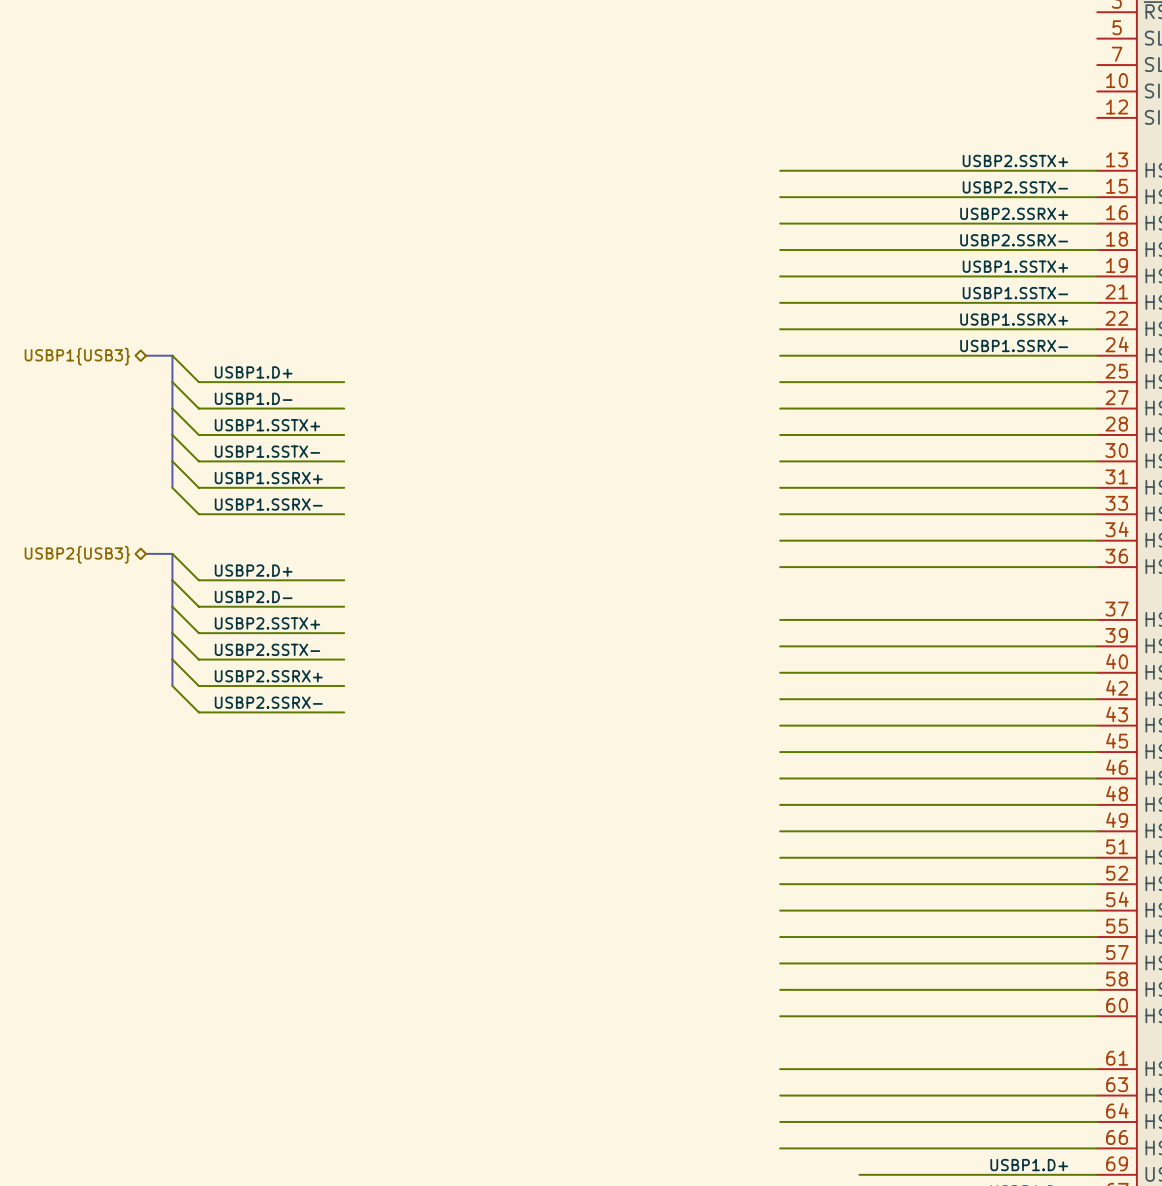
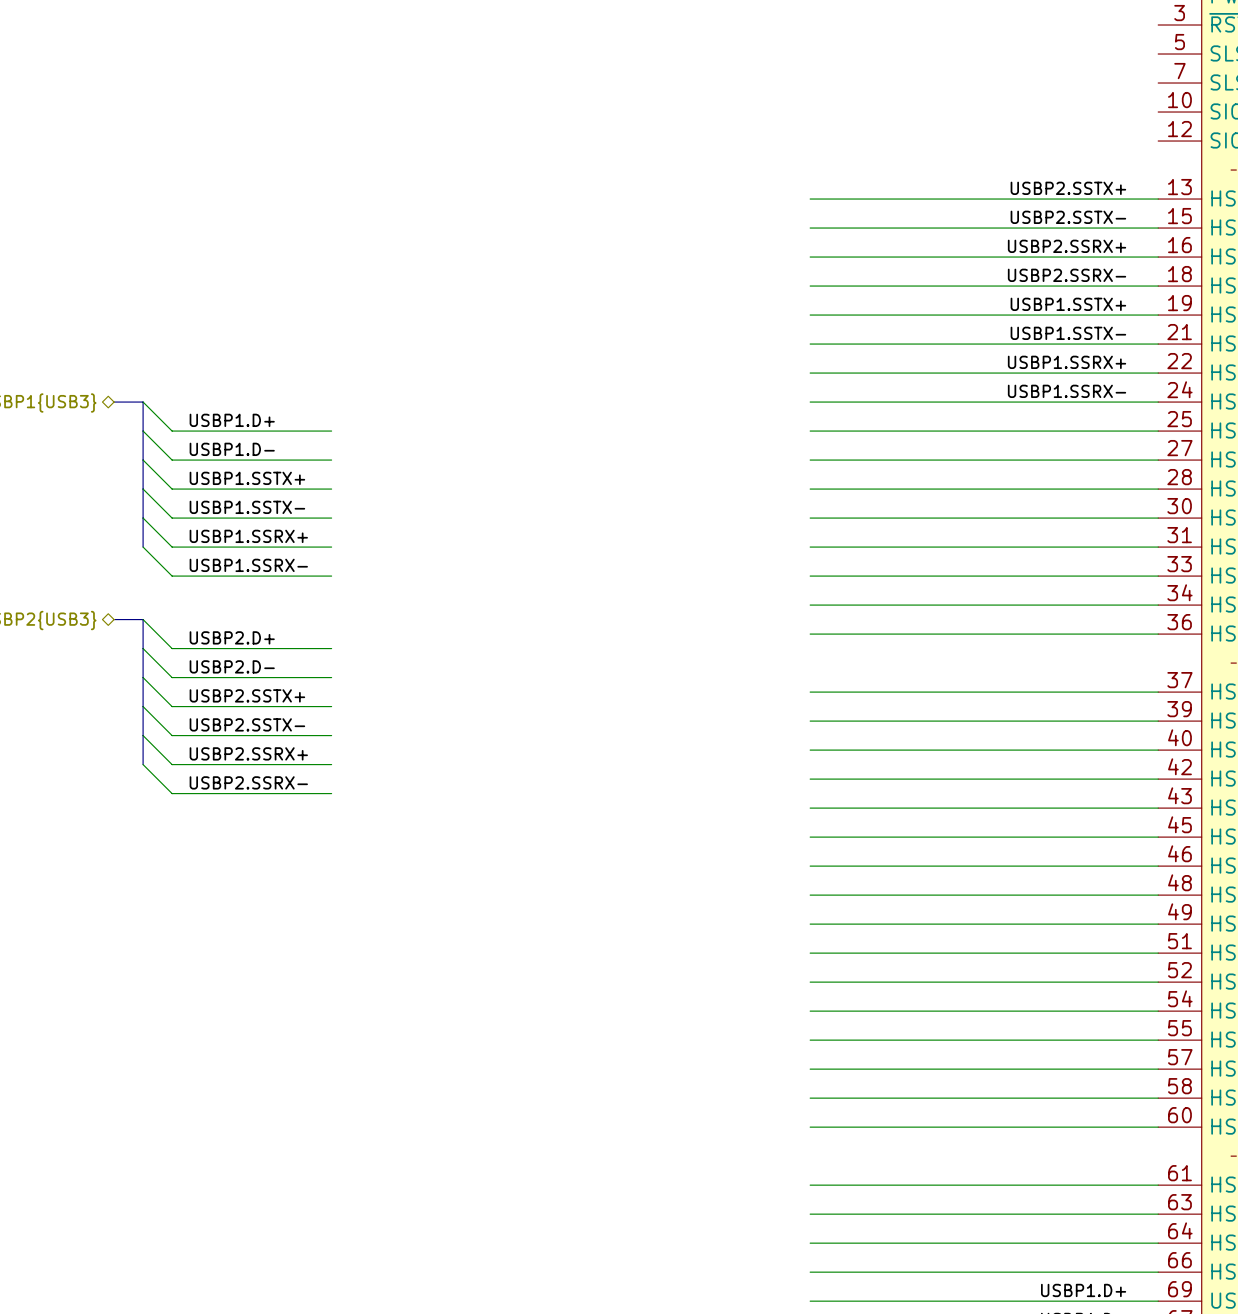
wire: none -> (810, 1301) (897, 1301)

